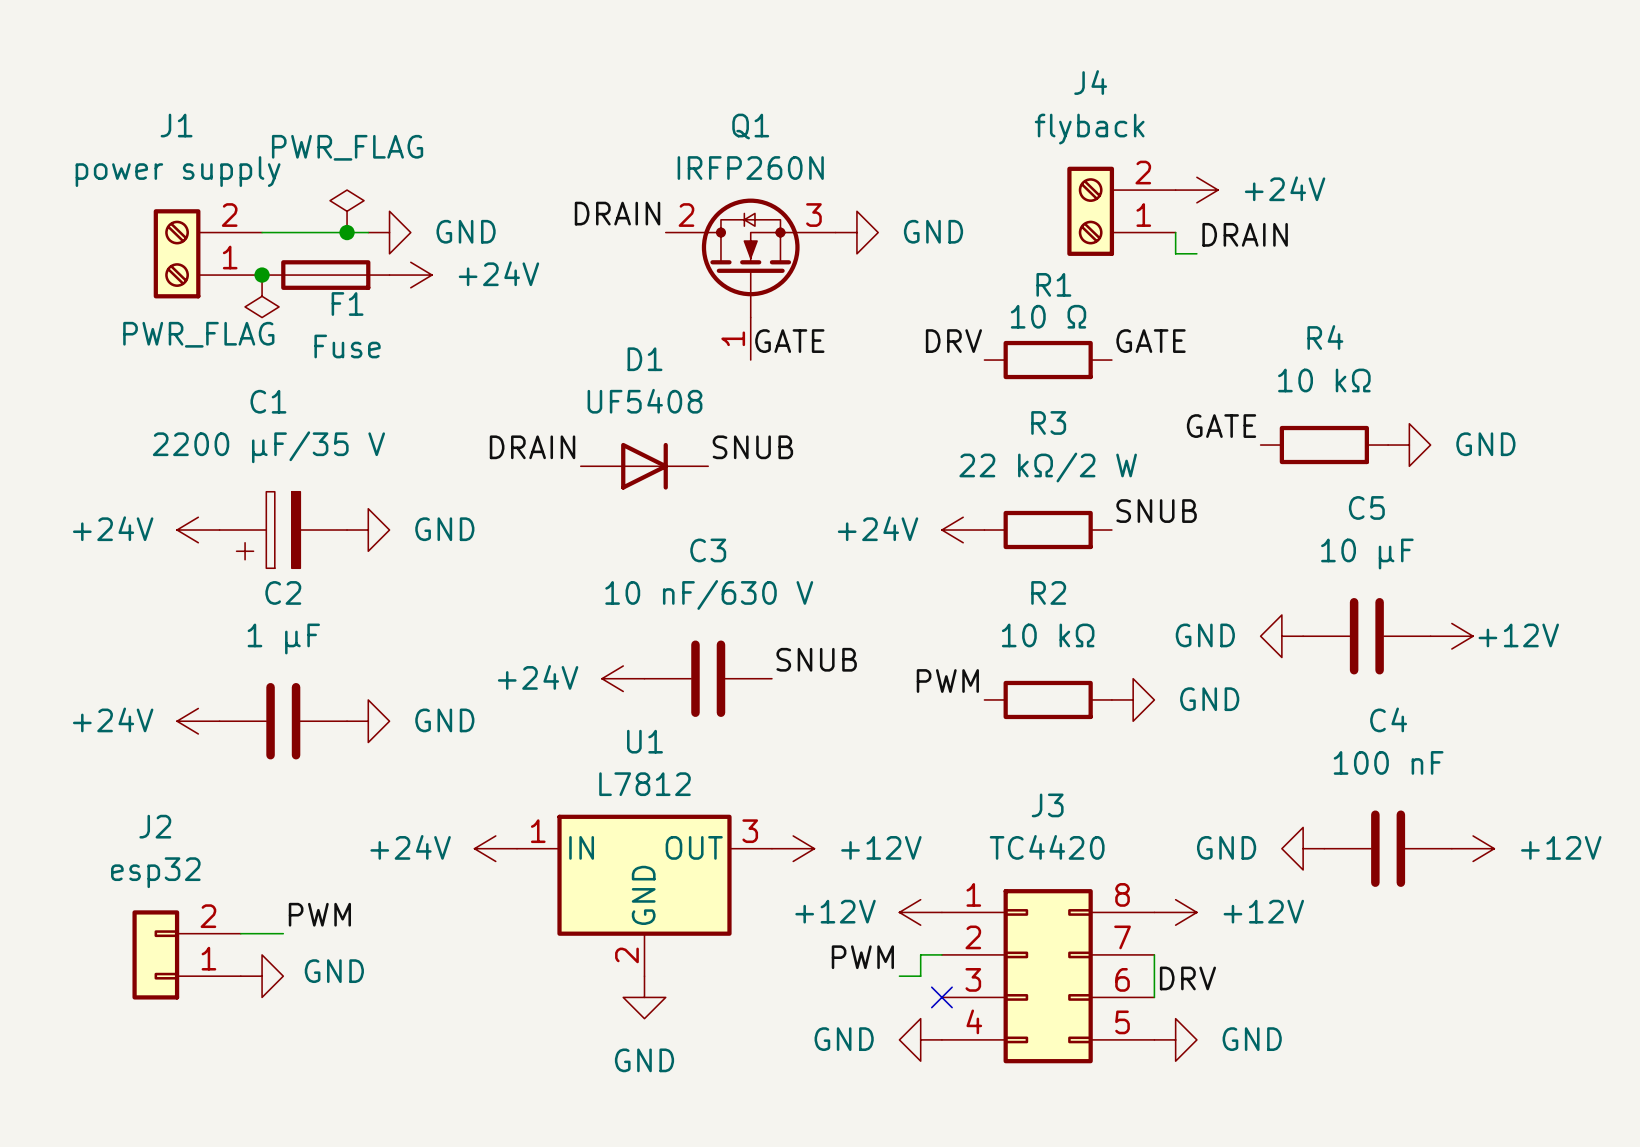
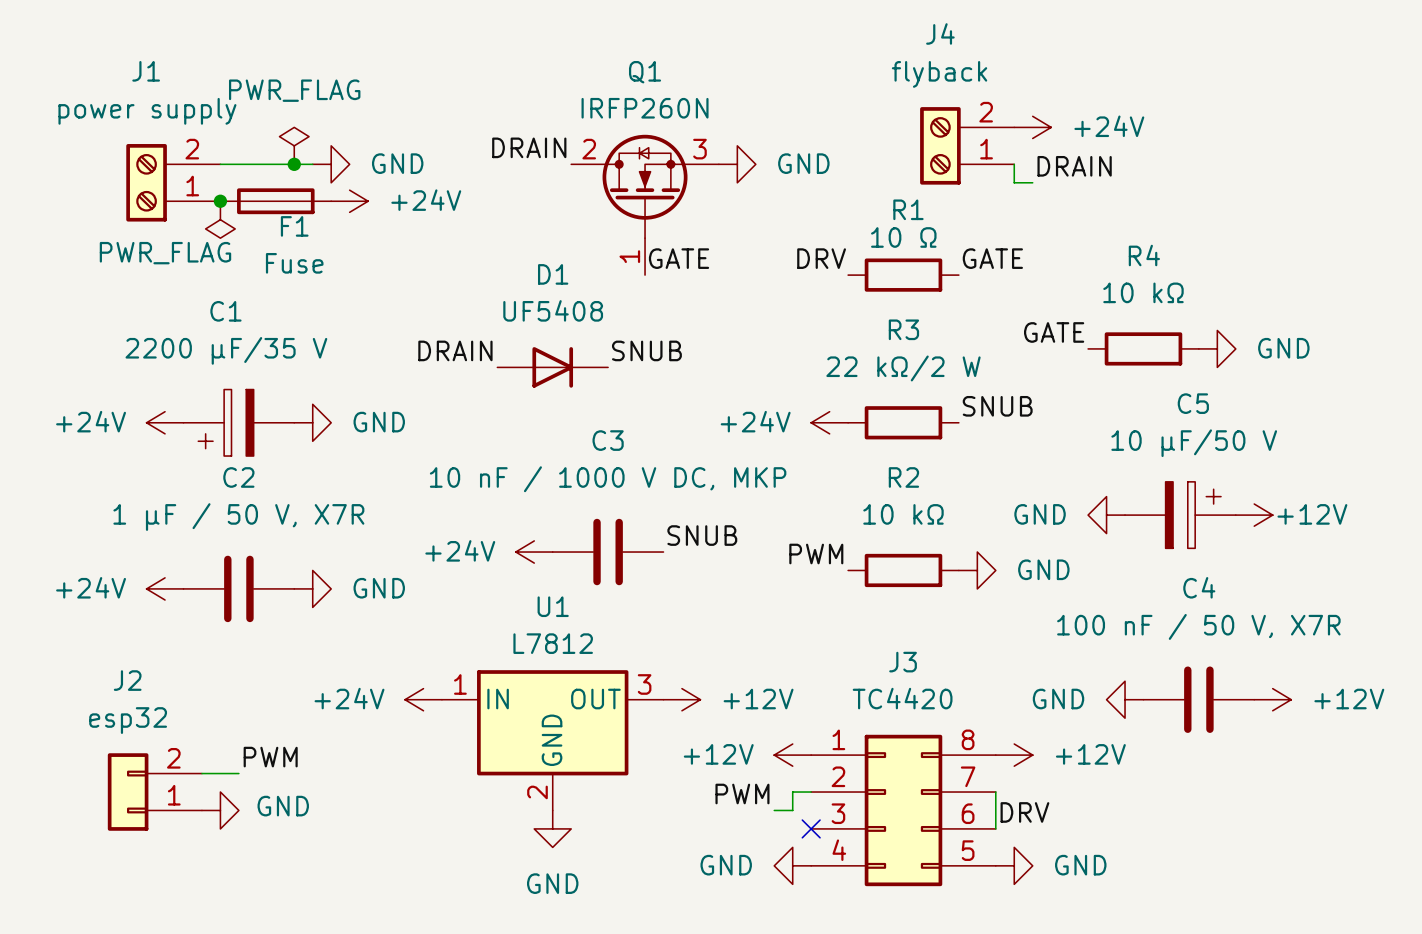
C5 value: 10 µF (1367, 553) -> 10 µF/50 V (1194, 443)
C3 value: 10 nF/630 V (709, 594) -> 10 nF / 1000 V DC, MKP (608, 479)
C5 symbol: [1303, 597, 1431, 675] -> [1125, 481, 1236, 549]
C2 value: 1 µF (283, 638) -> 1 µF / 50 V, X7R (238, 517)
C4 value: 100 nF (1388, 762) -> 100 nF / 50 V, X7R (1198, 626)

